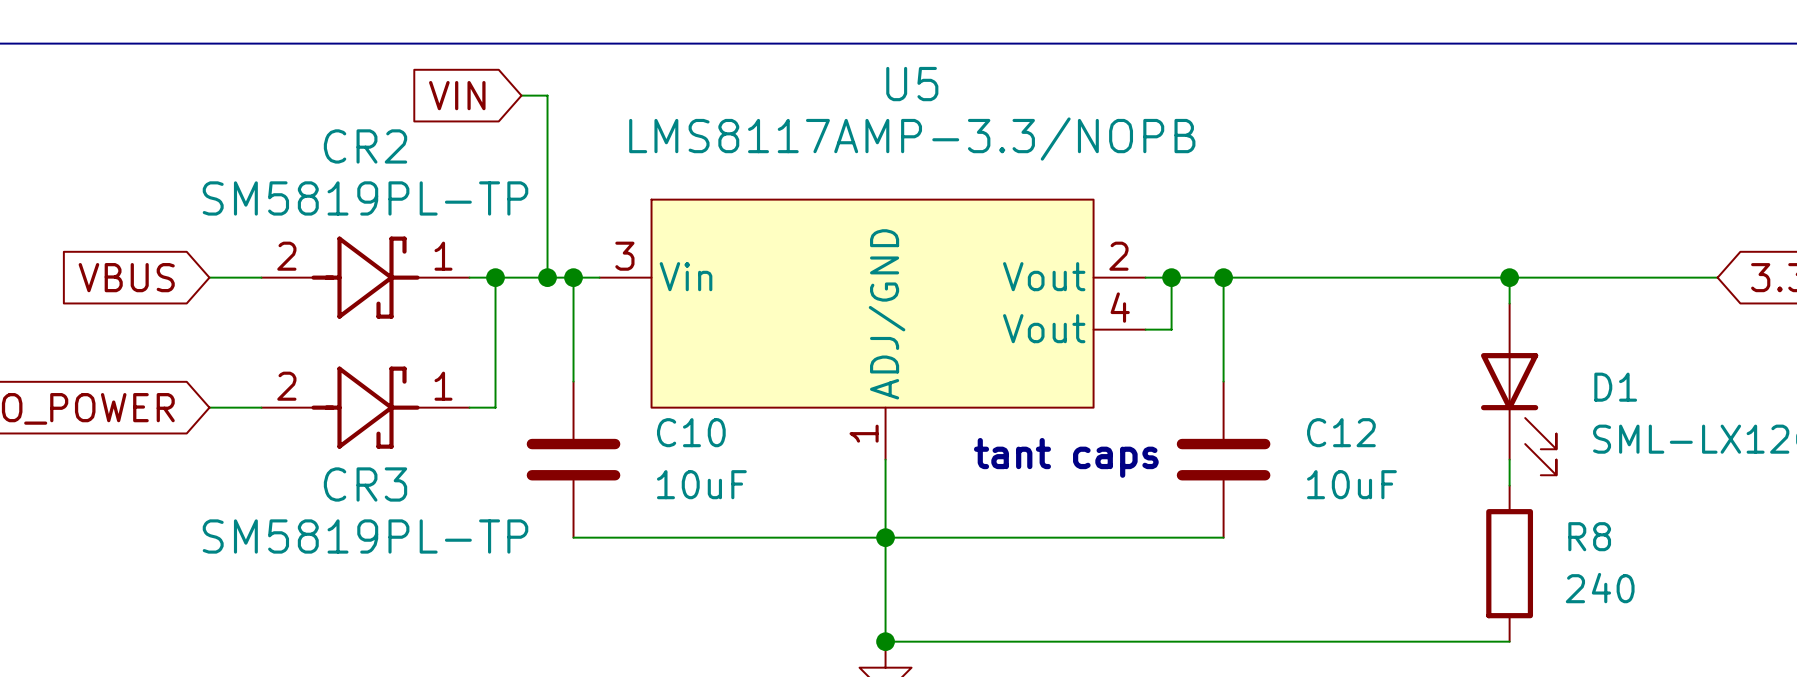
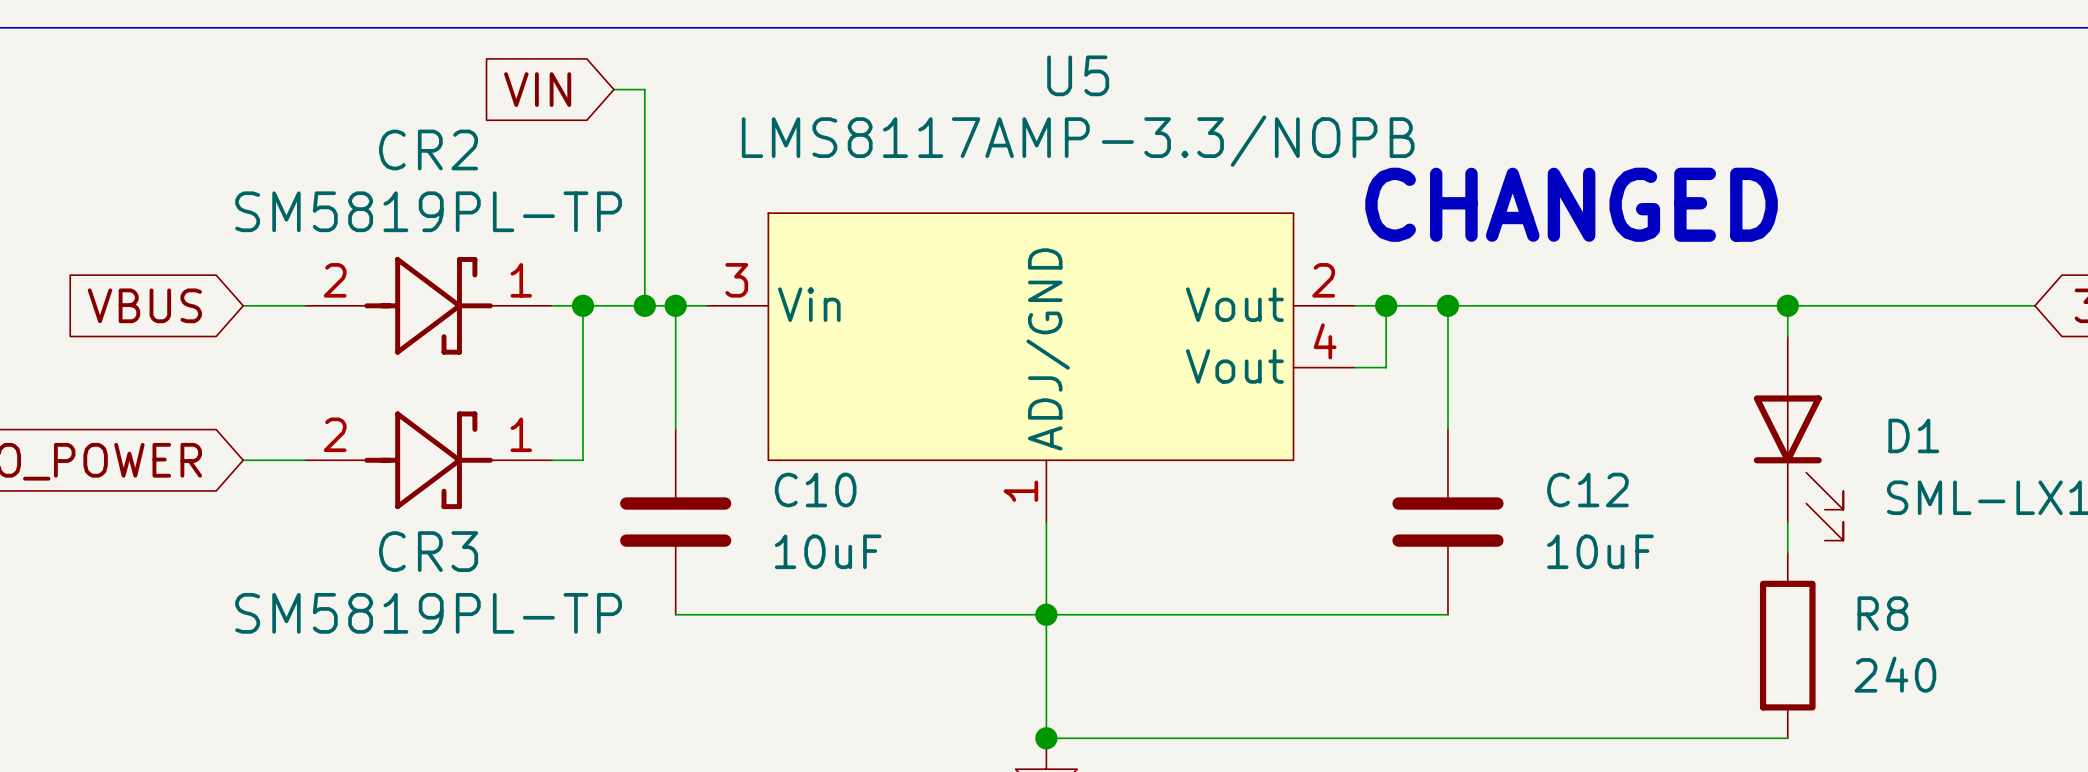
text: none -> CHANGED (1571, 204)
text: tant caps (1066, 457) -> none

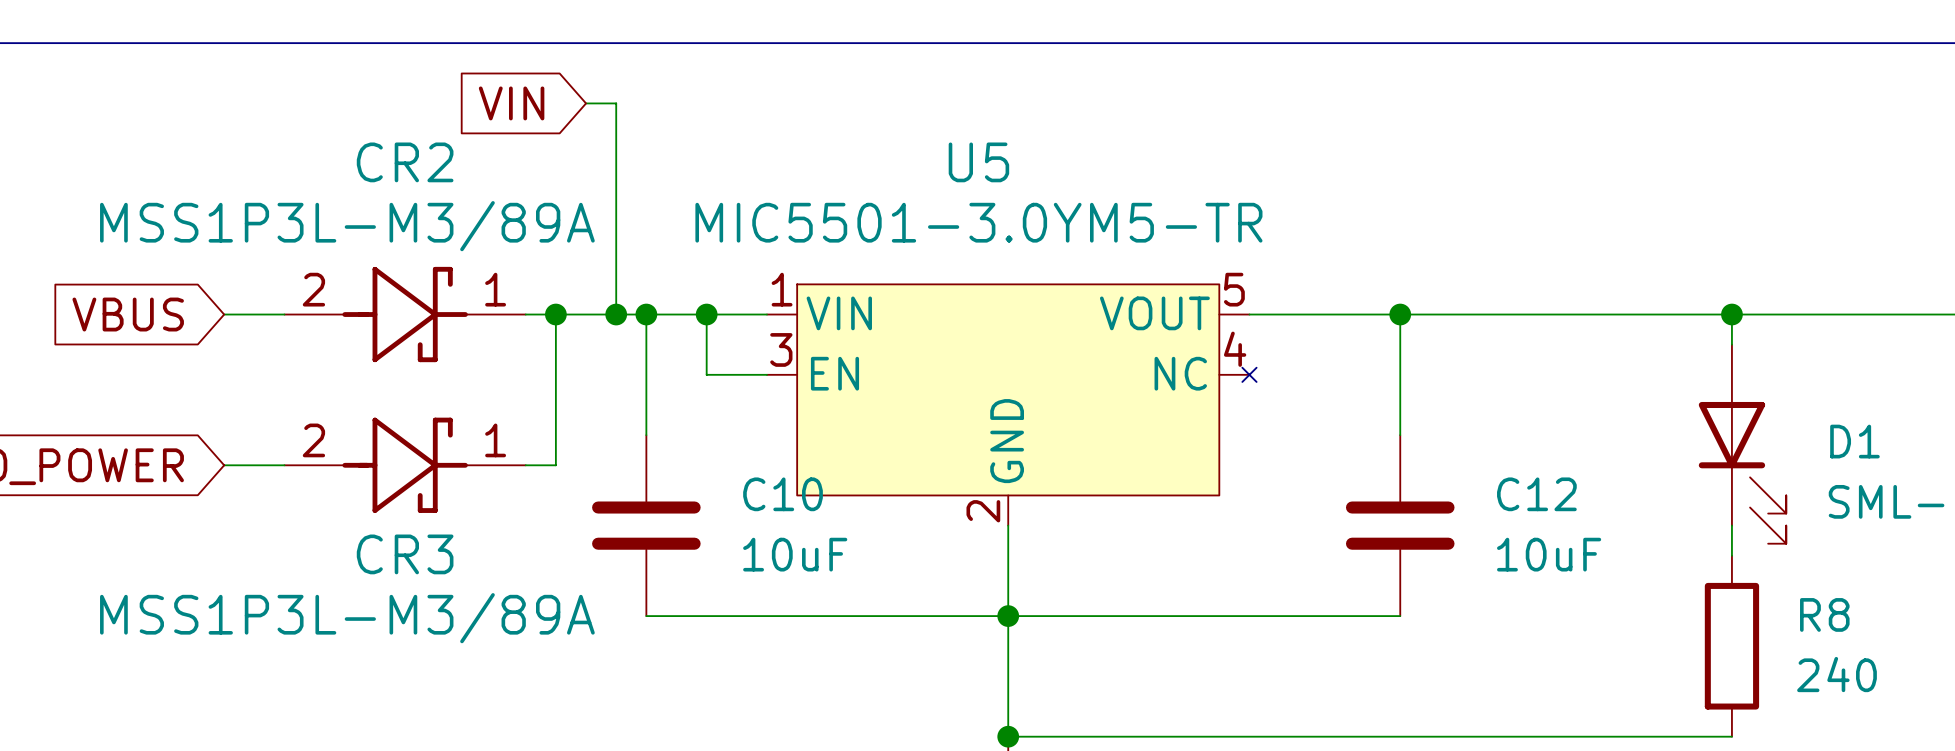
U5 name position: U5 (1078, 75) -> U5 (978, 162)
U5 value: LMS8117AMP-3.3/NOPB (1078, 141) -> MIC5501-3.0YM5-TR (978, 222)
text: CHANGED (1571, 204) -> none
CR2 value: SM5819PL-TP (428, 211) -> MSS1P3L-M3/89A (347, 226)
U5 symbol: [706, 213, 1356, 523] -> [766, 284, 1257, 526]
wire: none -> (706, 314) (706, 374) (766, 374)
junction: none -> (706, 314)
wire: (1386, 305) (1386, 367) (1355, 367) -> none
junction: (1386, 305) -> none
CR3 value: SM5819PL-TP (428, 613) -> MSS1P3L-M3/89A (347, 618)

